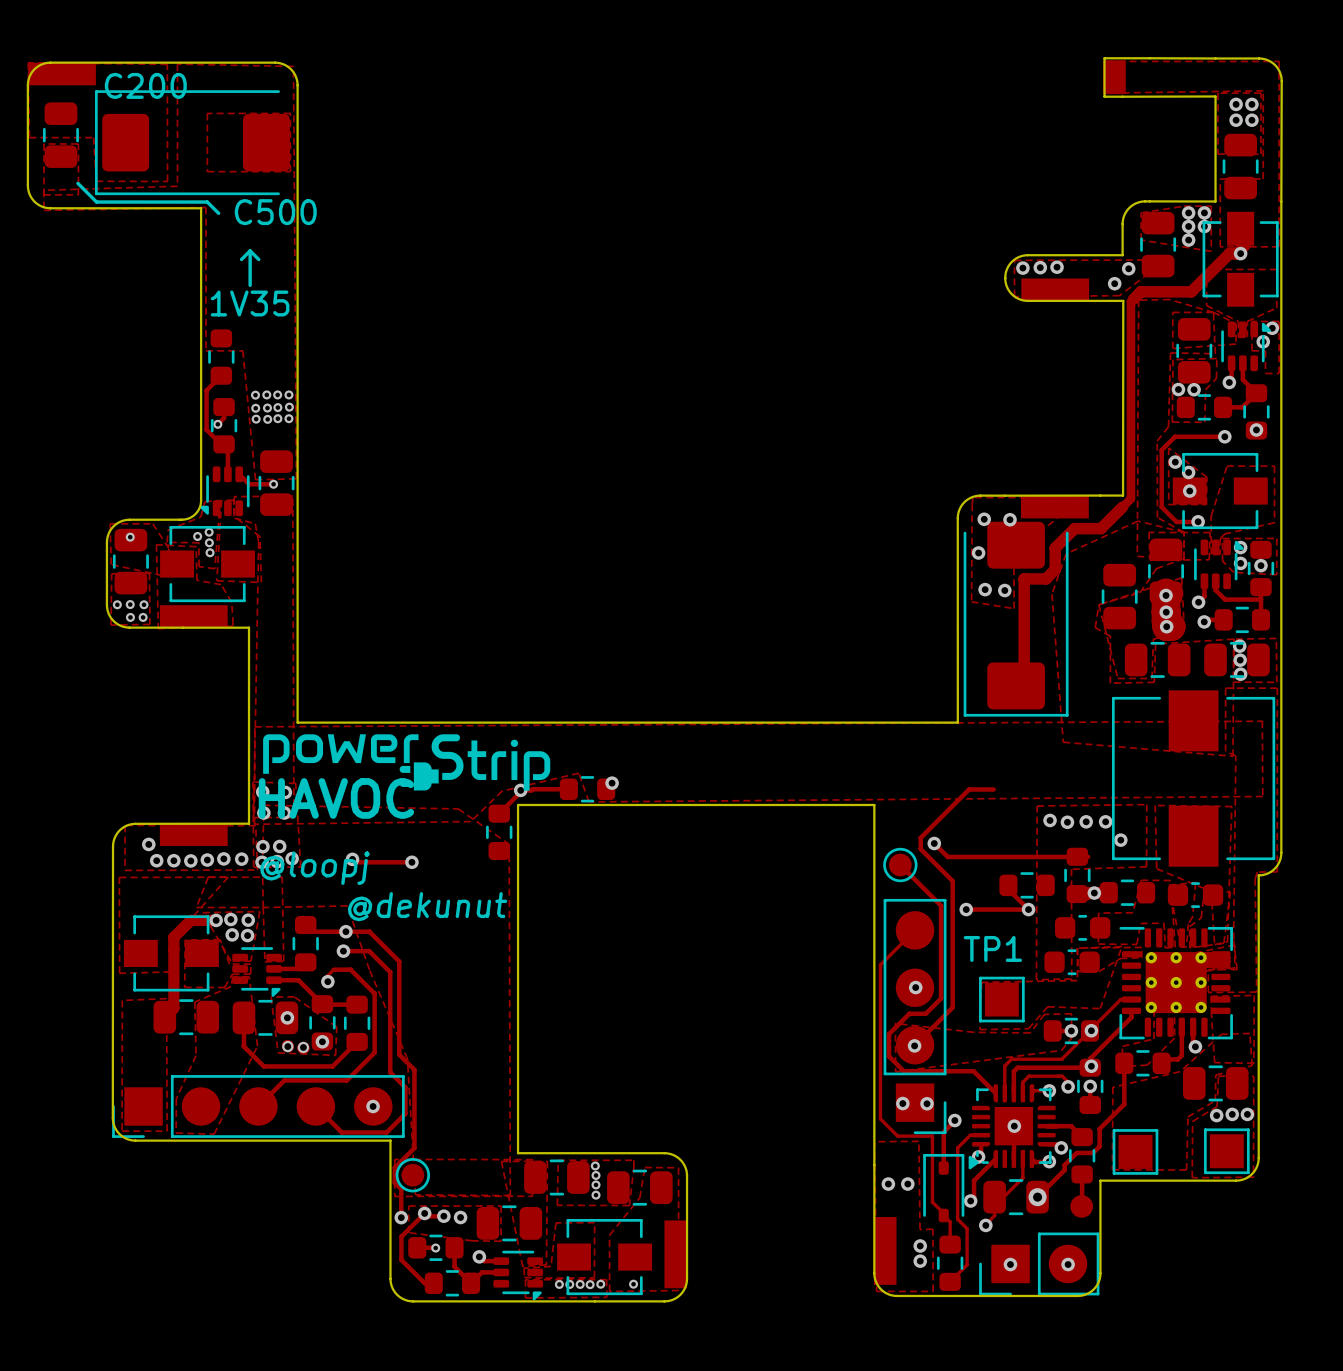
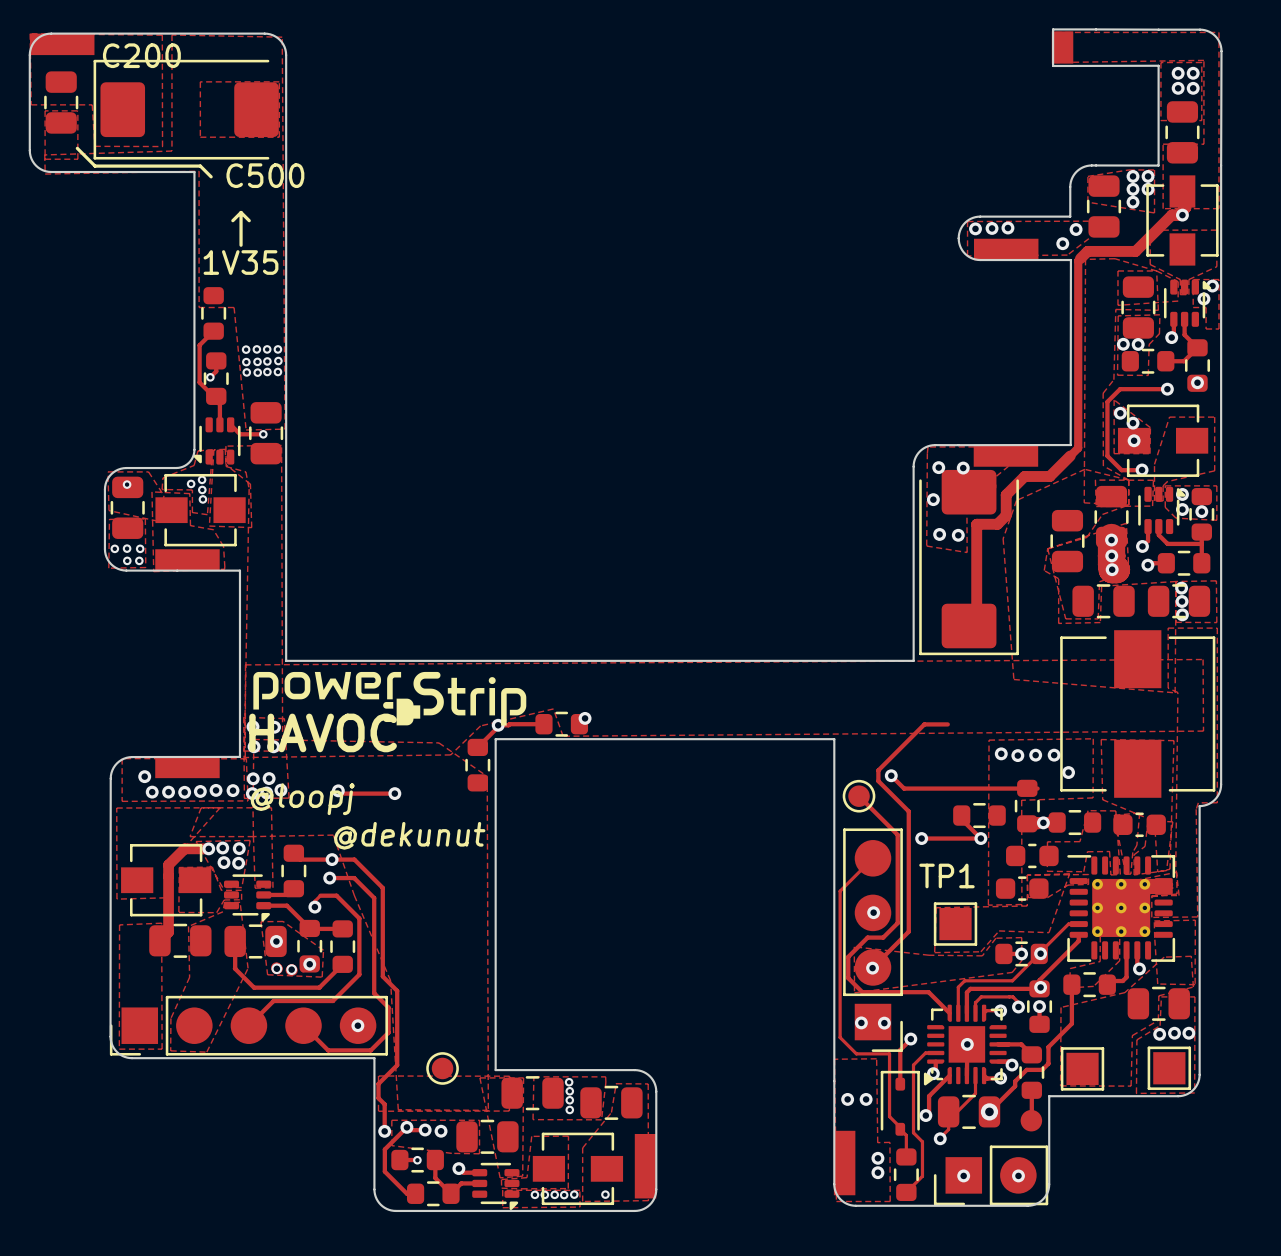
part position: (412, 1175) -> (442, 1068)

